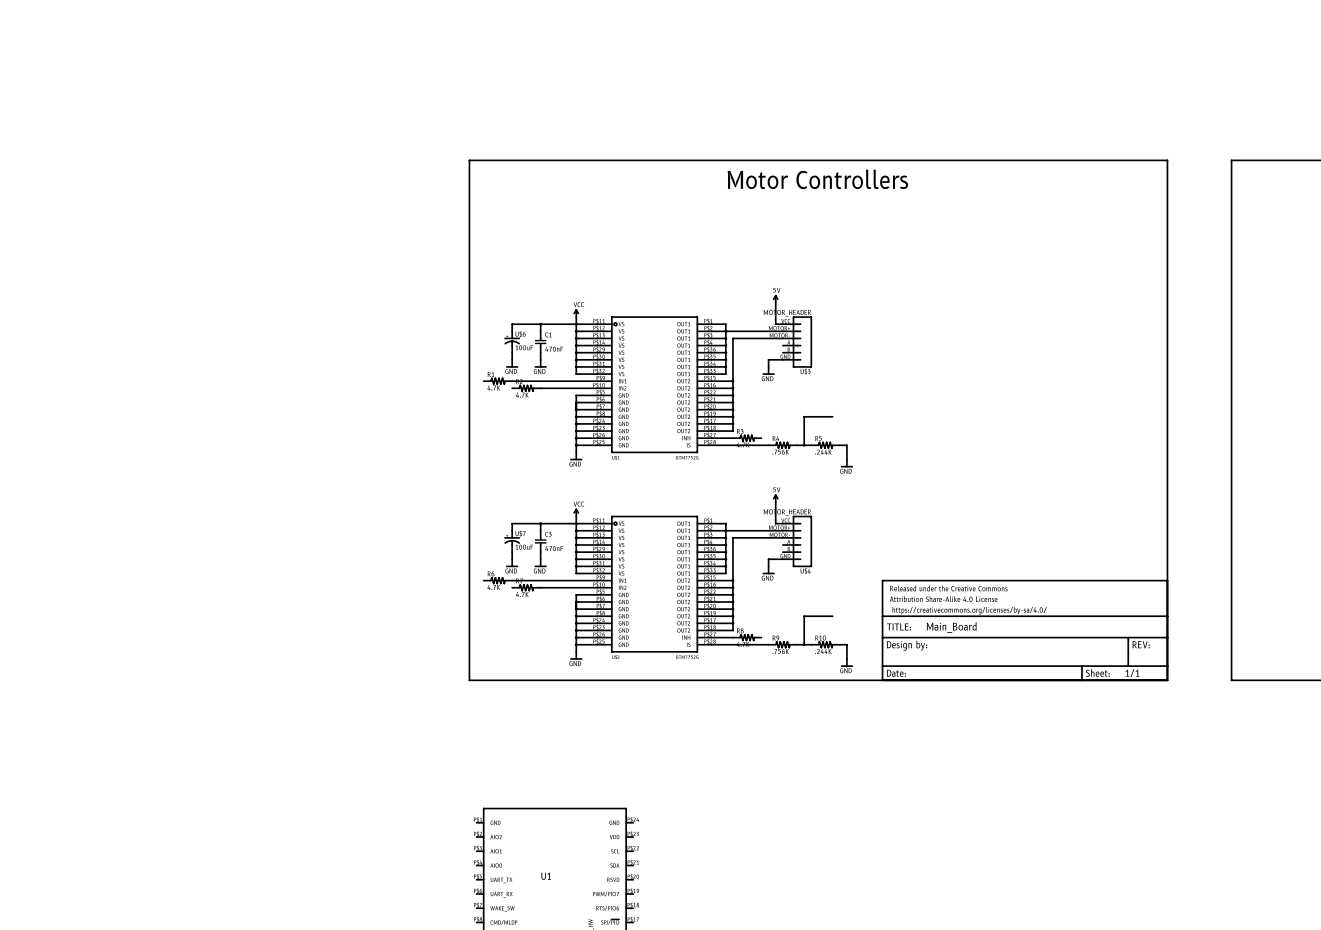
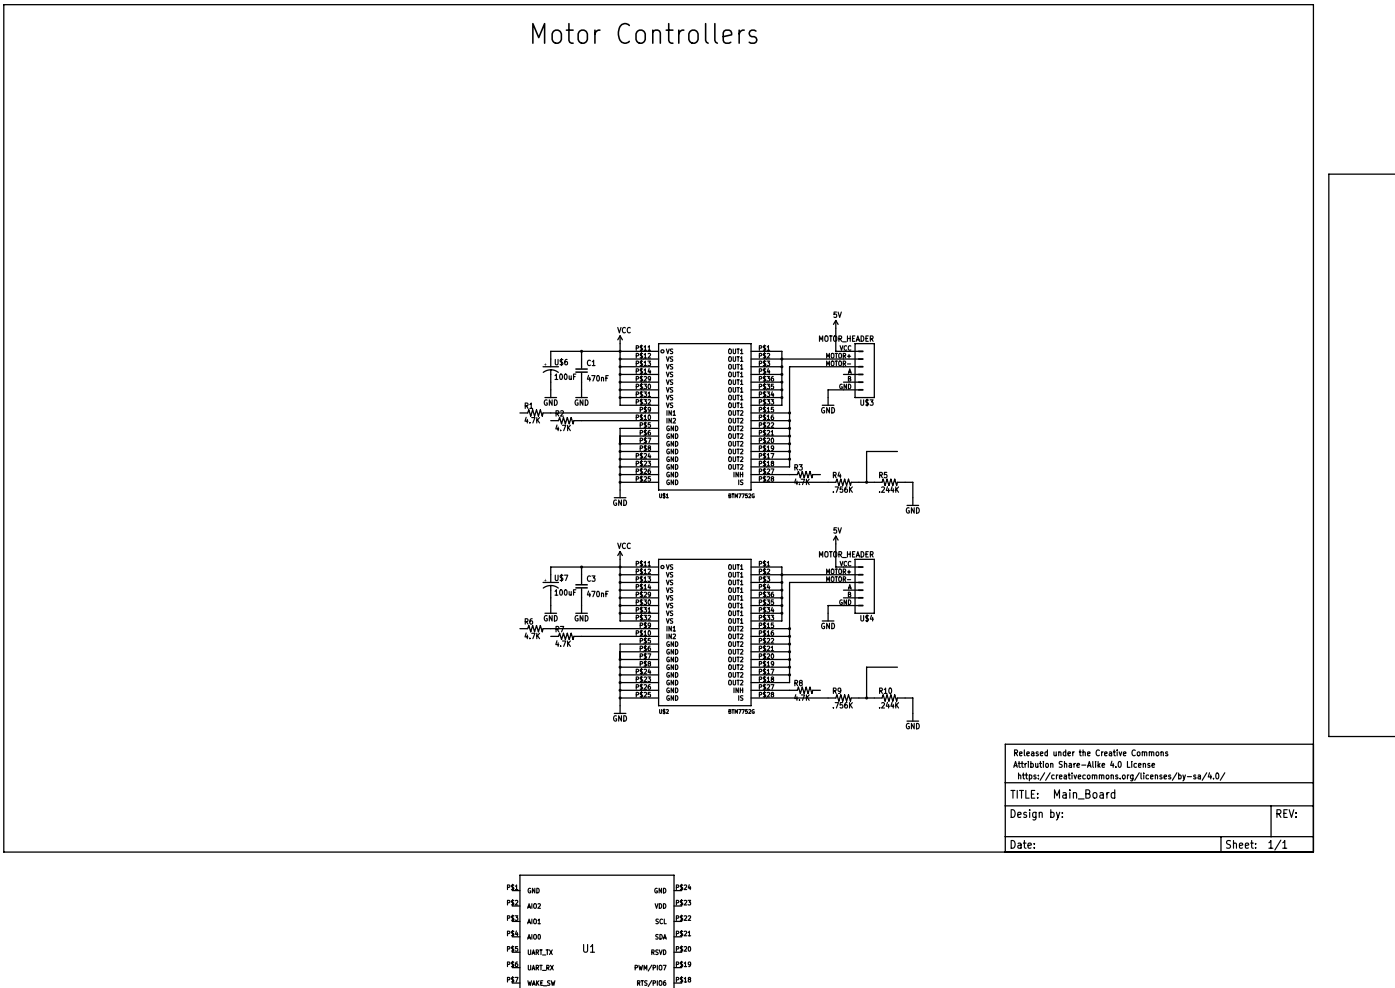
text: none -> Motor Controllers (644, 33)
text: Motor Controllers (817, 179) -> none
part: none -> (658, 428)
part: (818, 420) -> none
part: (1025, 630) -> none
part: none -> (1159, 798)

